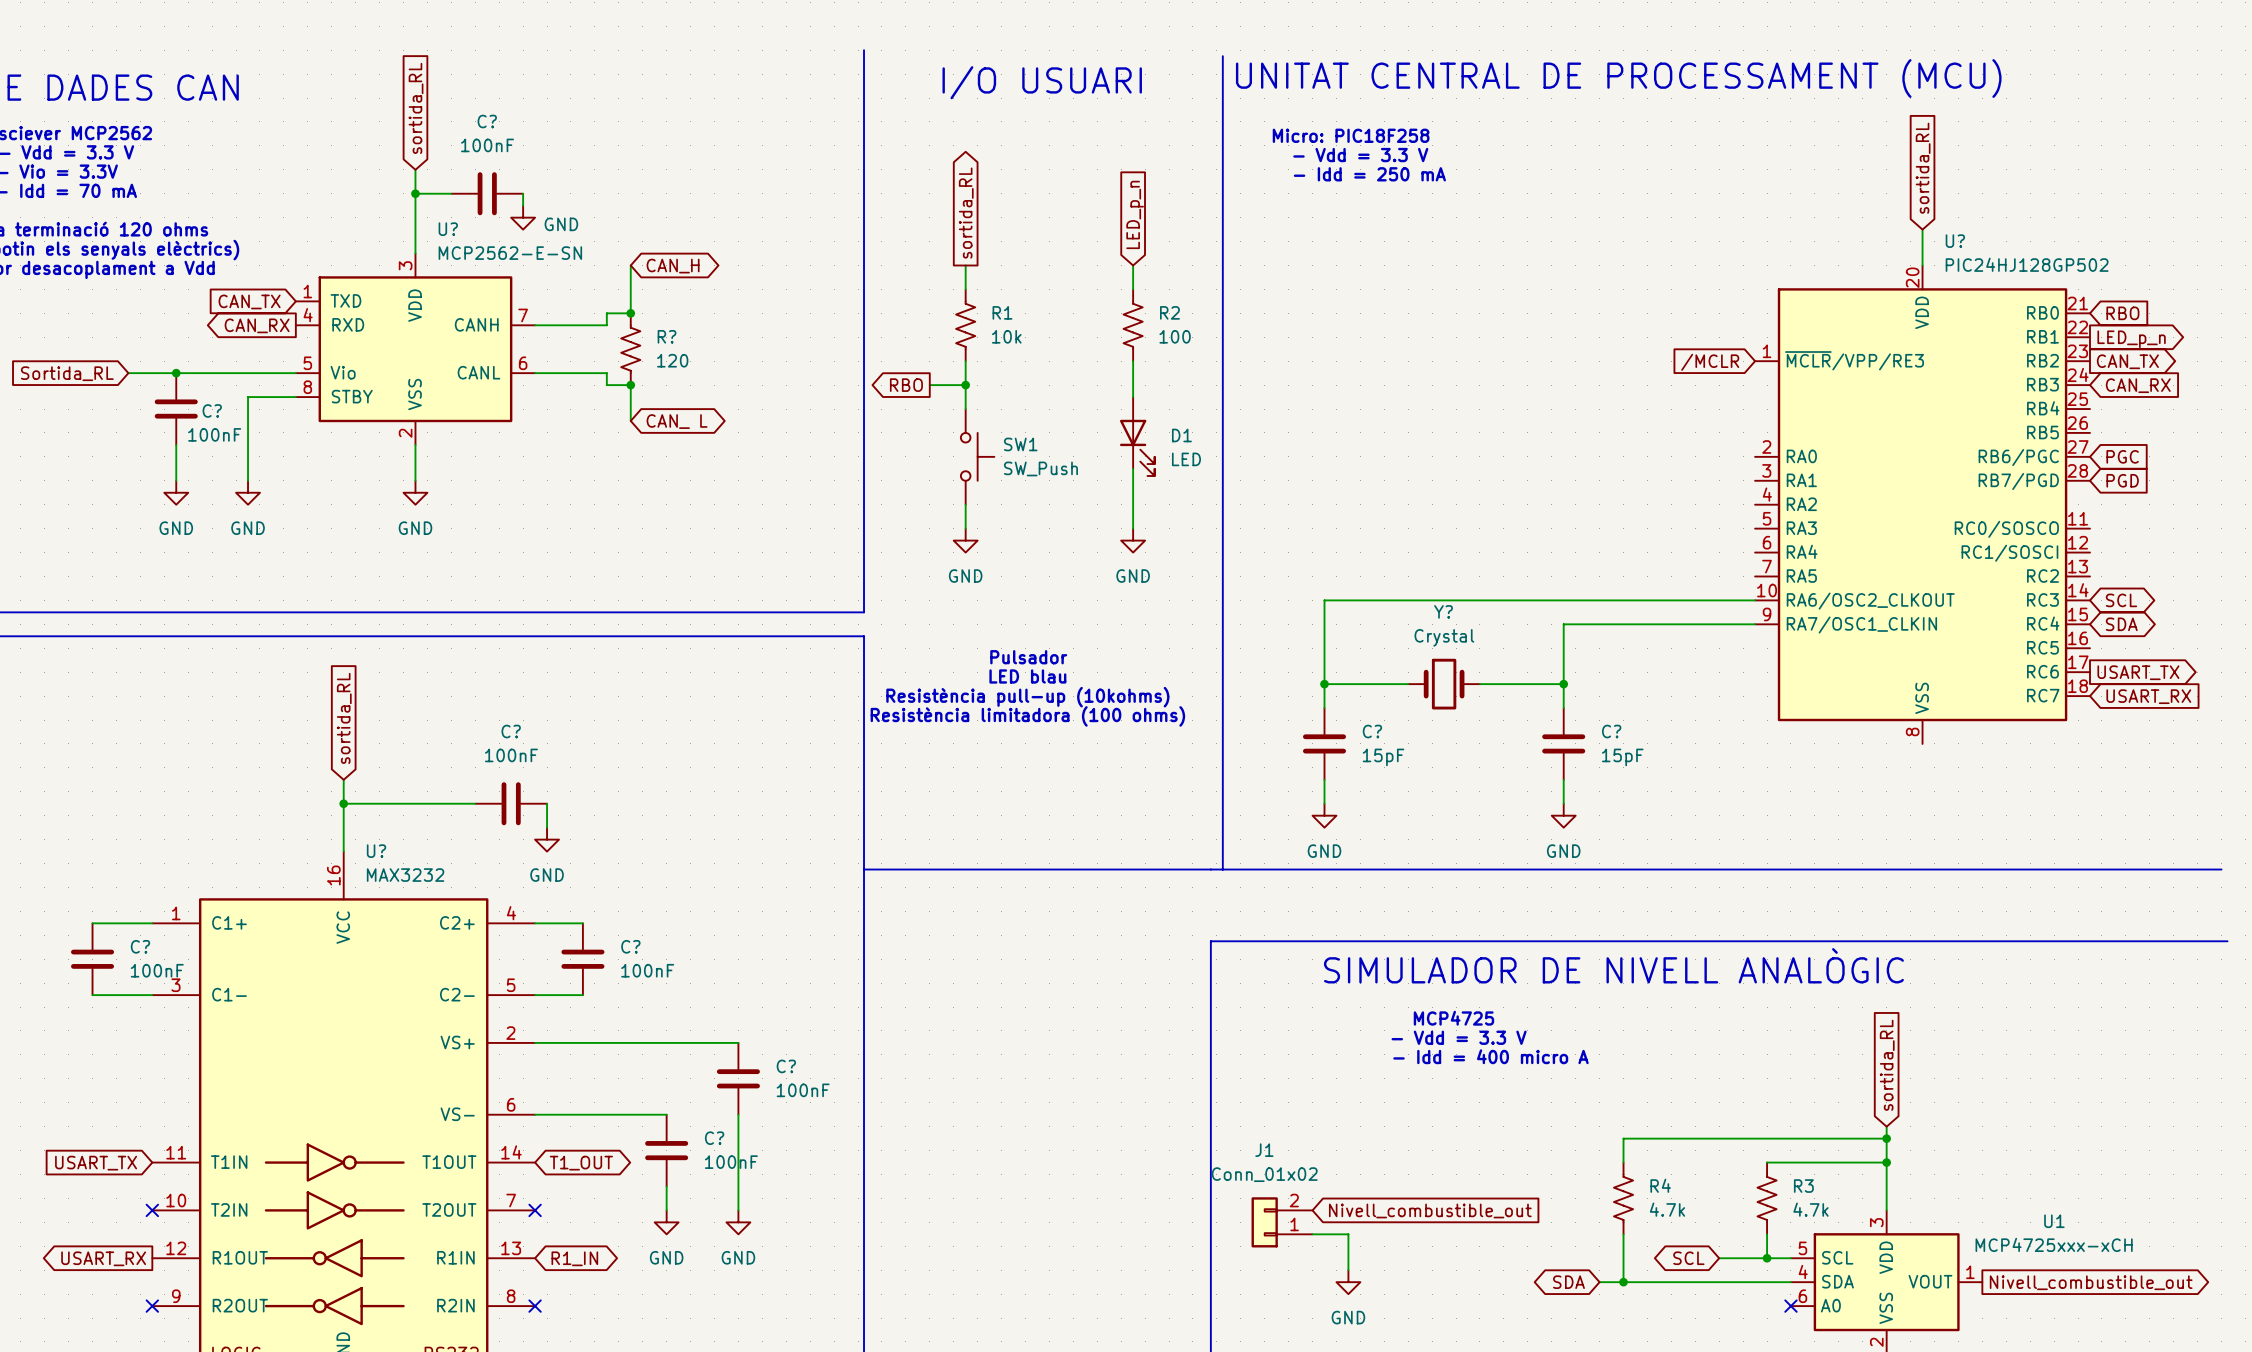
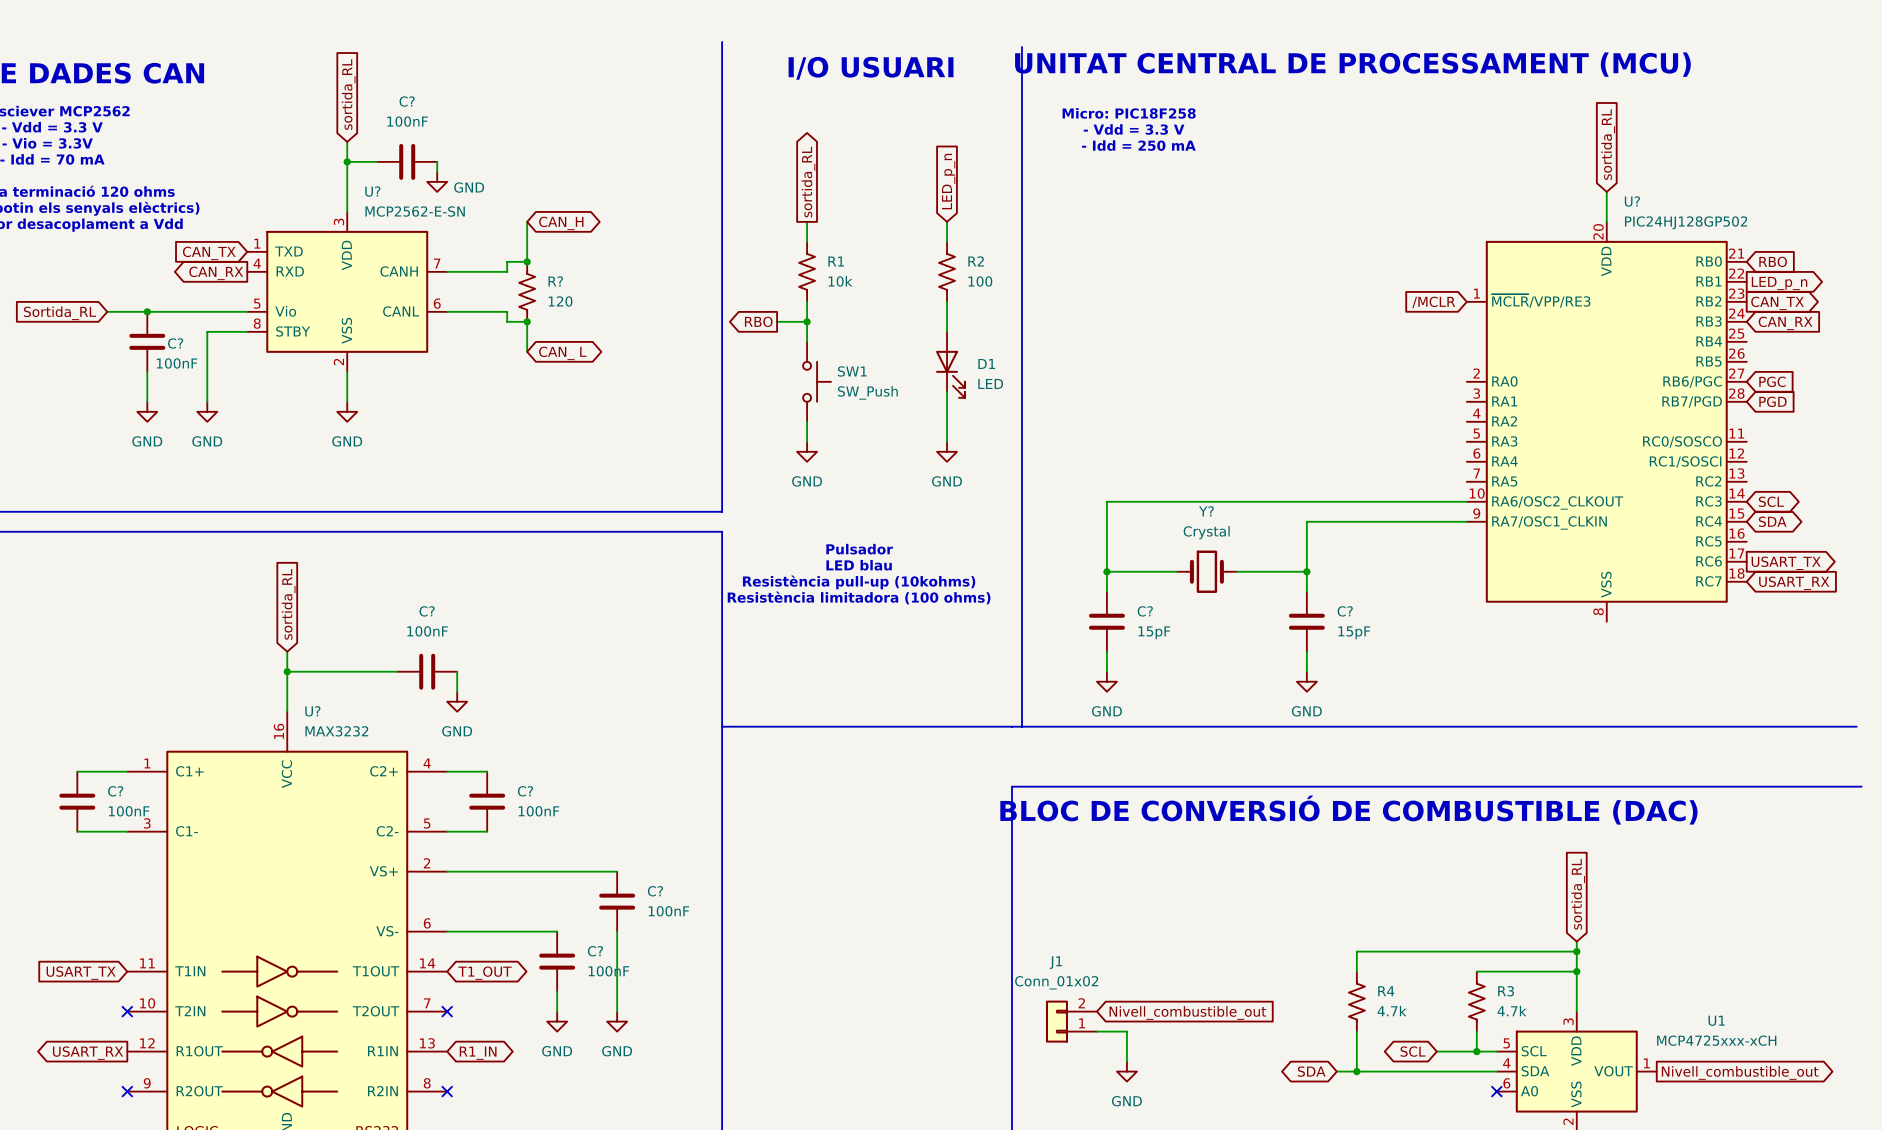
text: SIMULADOR DE NIVELL ANALÒGIC (1613, 965) -> BLOC DE CONVERSIÓ DE COMBUSTIBLE (DAC) (1348, 810)
text: MCP4725 (1453, 1018) -> none
text: - Vdd = 3.3 V (1459, 1037) -> none
text: - Idd = 400 micro A (1490, 1056) -> none

